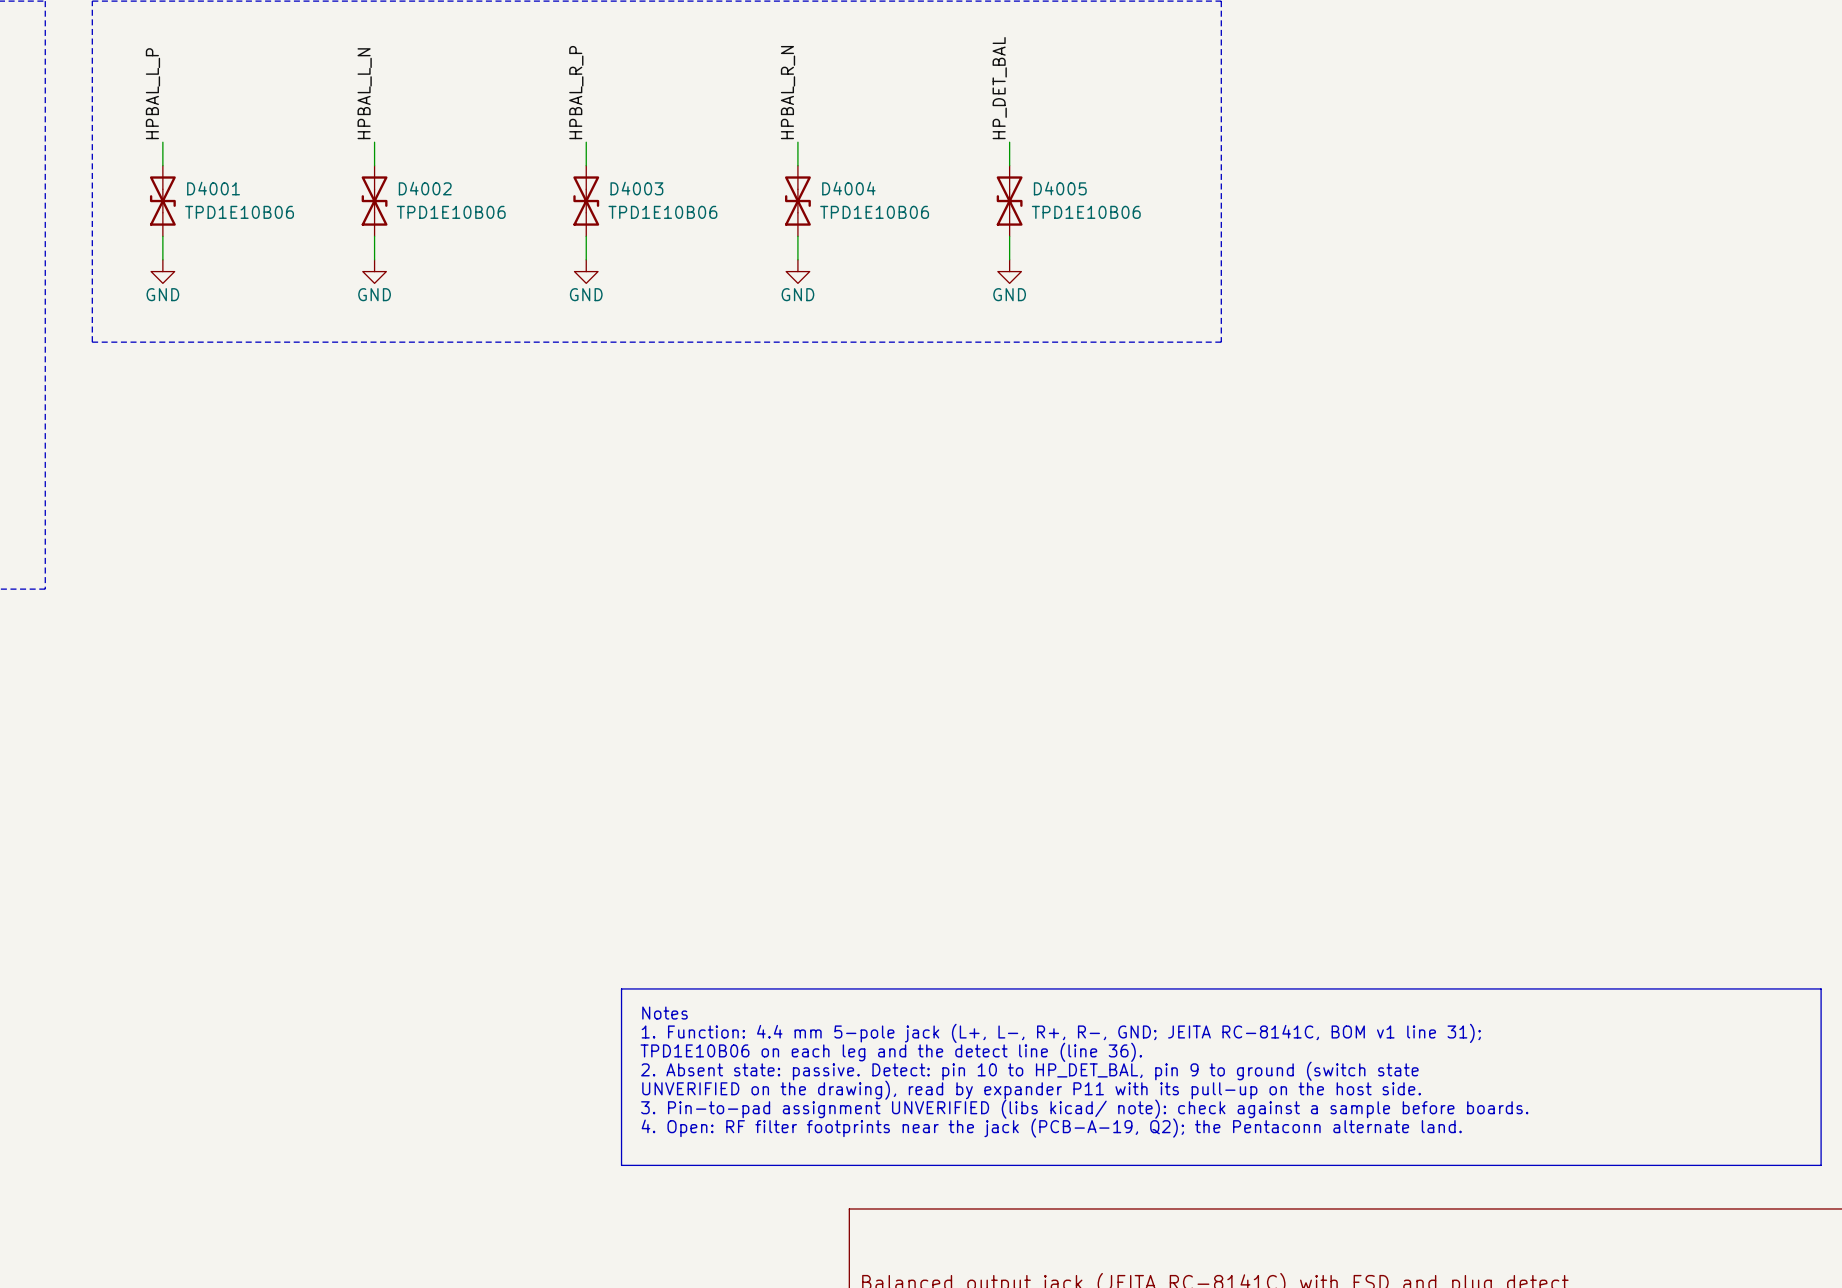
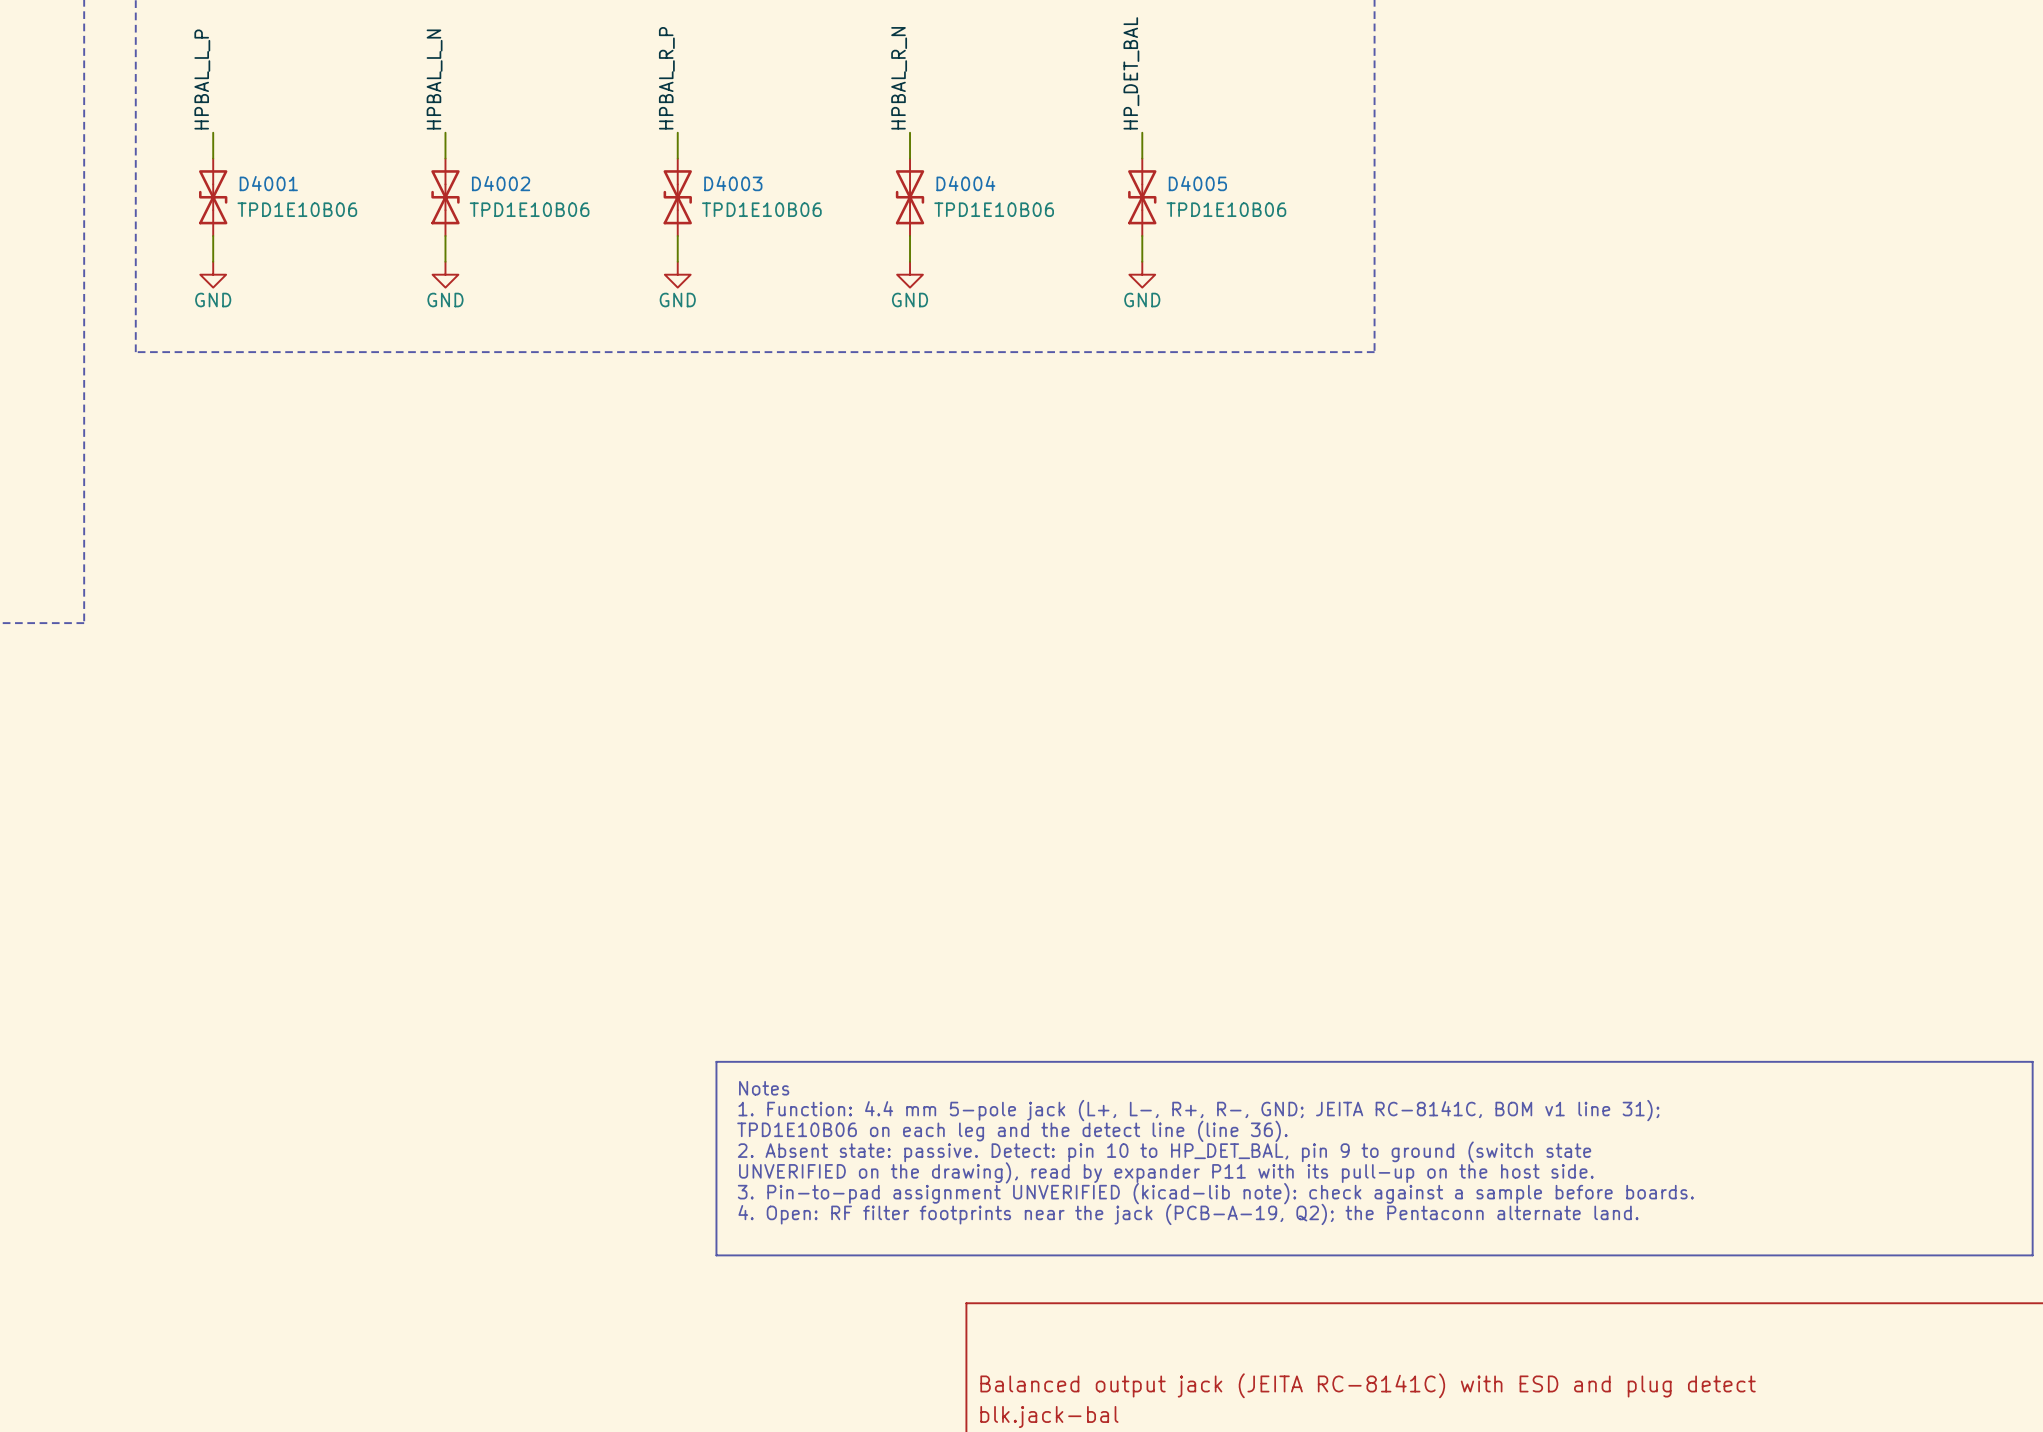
text: 3. Pin-to-pad assignment UNVERIFIED (libs kicad/ note): check against a sample before boards. (1084, 1109) -> 3. Pin-to-pad assignment UNVERIFIED (kicad-lib note): check against a sample before boards. (1215, 1193)

